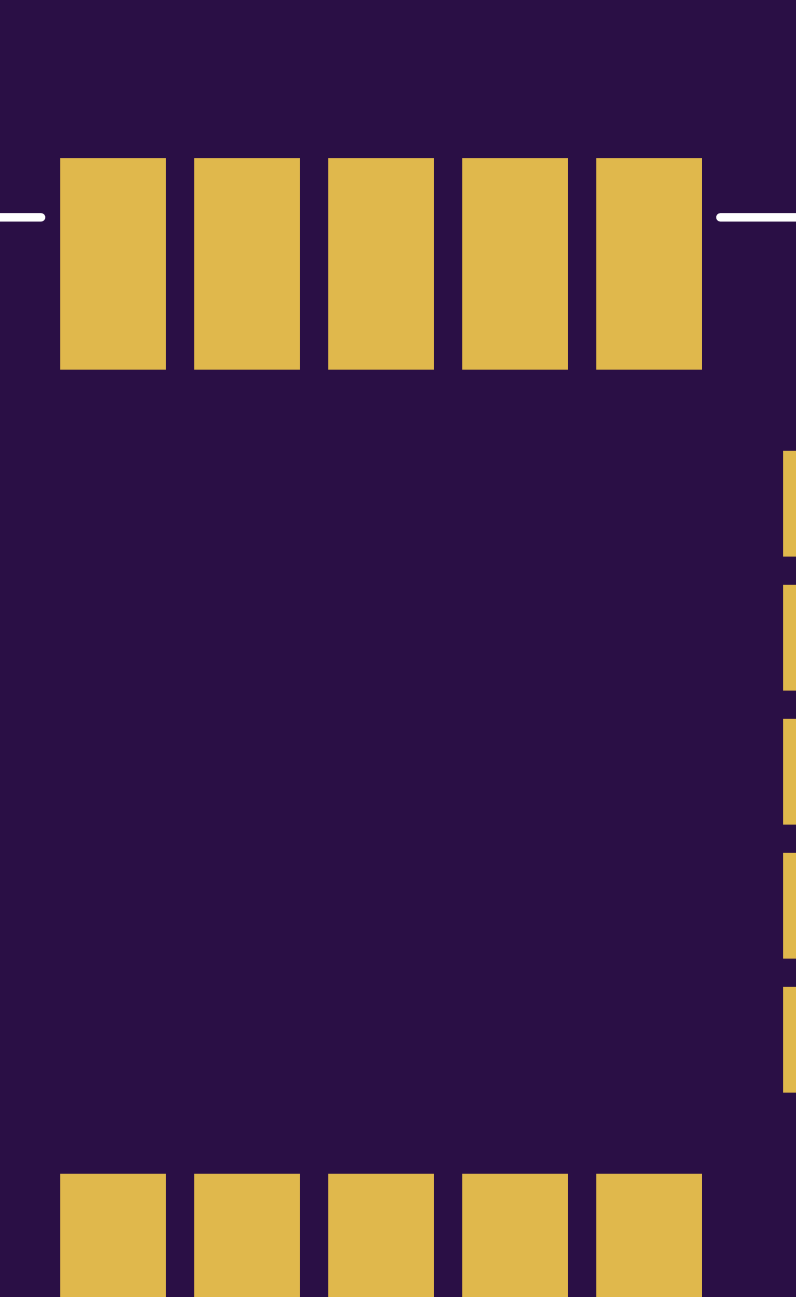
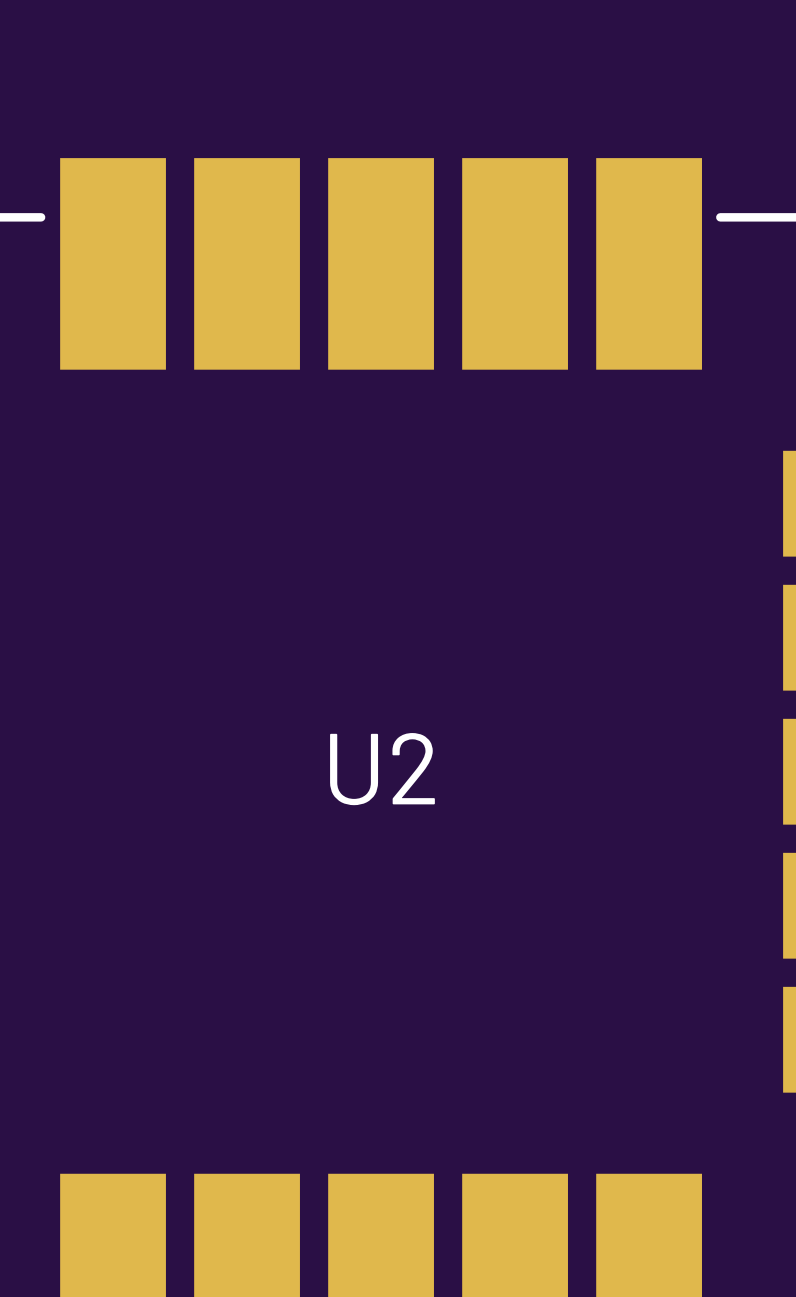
U2 name: none -> U2 (382, 769)

